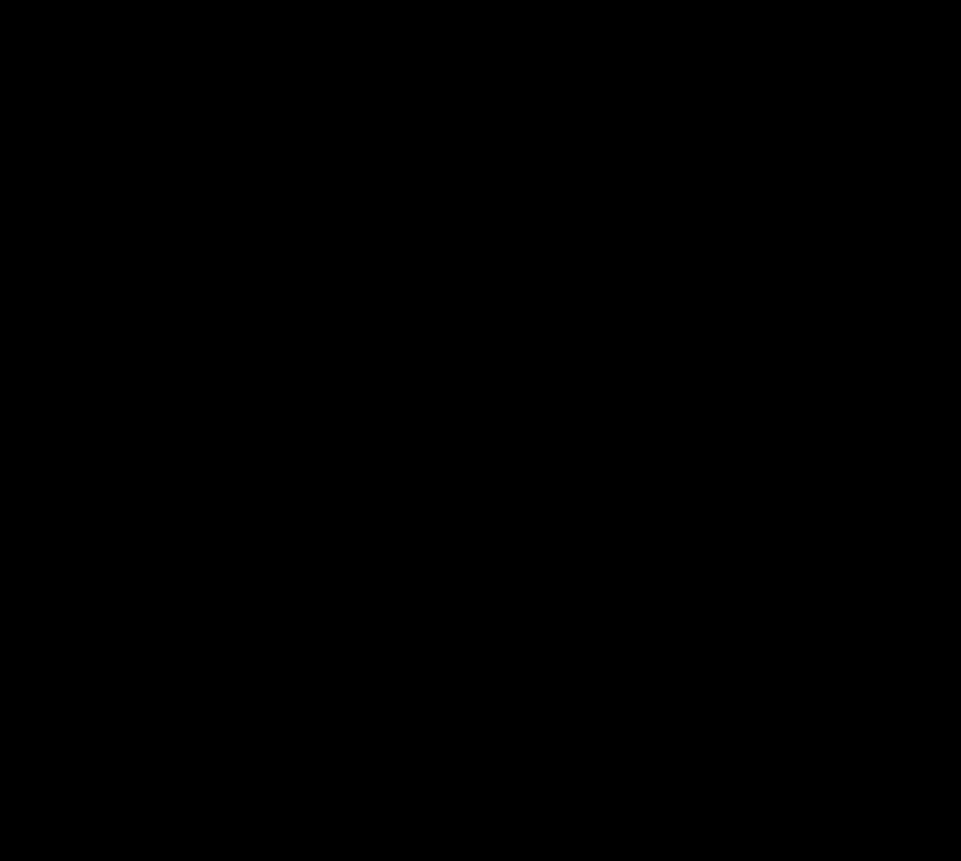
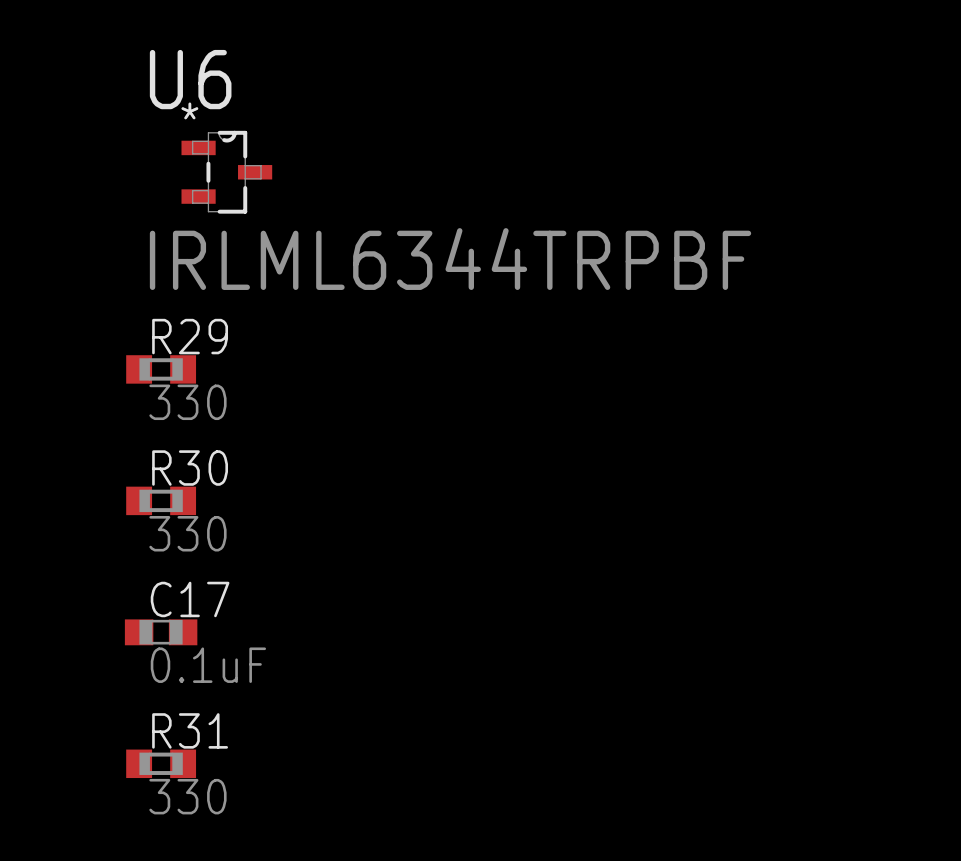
U6: none -> IRLML6344TRPBF (226, 172)
R29: none -> 330 (161, 369)
R30: none -> 330 (161, 500)
C17: none -> 0.1uF (161, 632)
R31: none -> 330 (161, 763)

